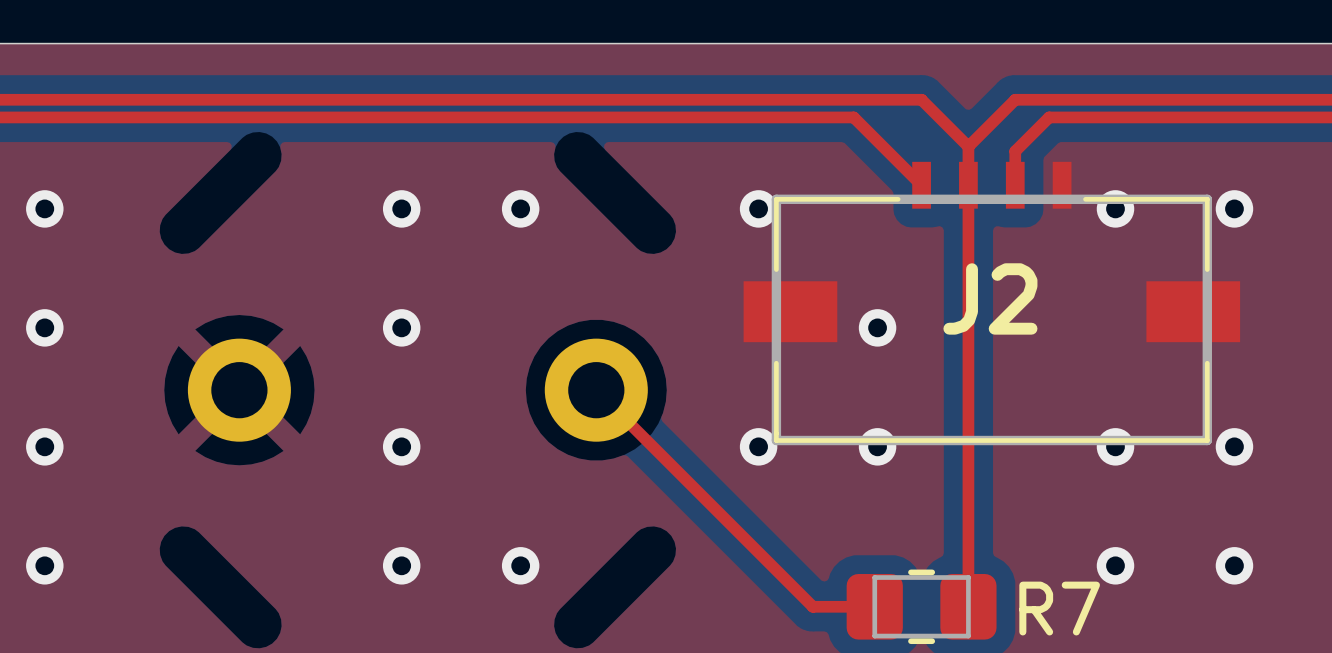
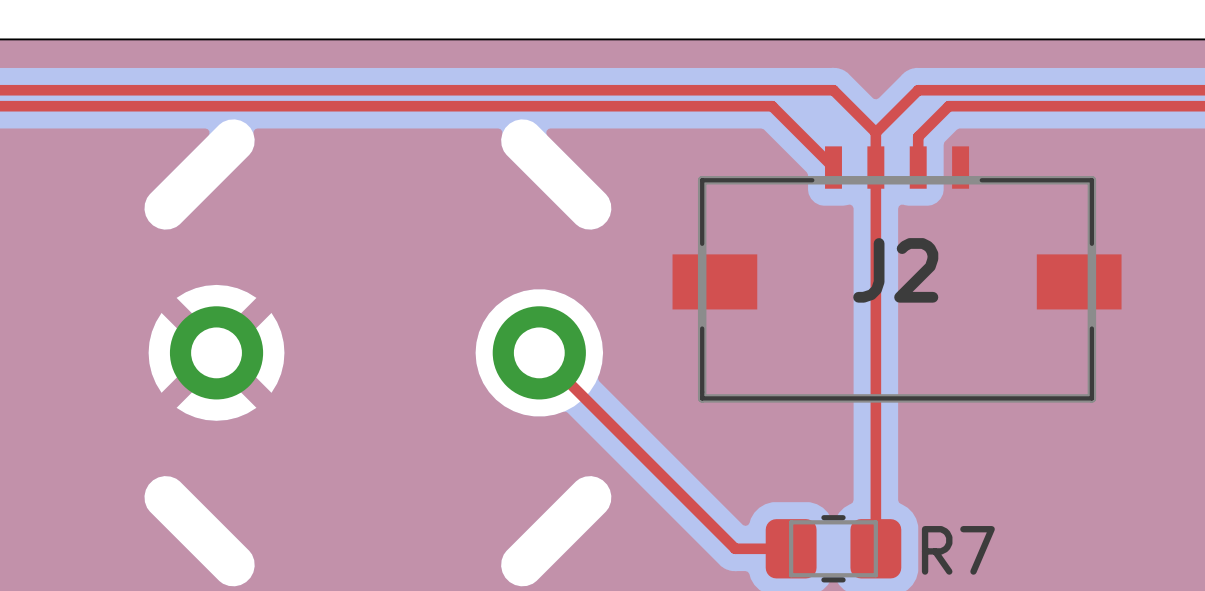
via: (44, 208) -> none
via: (401, 208) -> none
via: (520, 208) -> none
via: (758, 208) -> none
via: (1115, 208) -> none
via: (1234, 208) -> none
via: (44, 327) -> none
via: (401, 327) -> none
via: (877, 327) -> none
via: (44, 446) -> none
via: (401, 446) -> none
via: (758, 446) -> none
via: (877, 446) -> none
via: (1115, 446) -> none
via: (1234, 446) -> none
via: (44, 565) -> none
via: (401, 565) -> none
via: (520, 565) -> none
via: (1115, 565) -> none
via: (1234, 565) -> none

